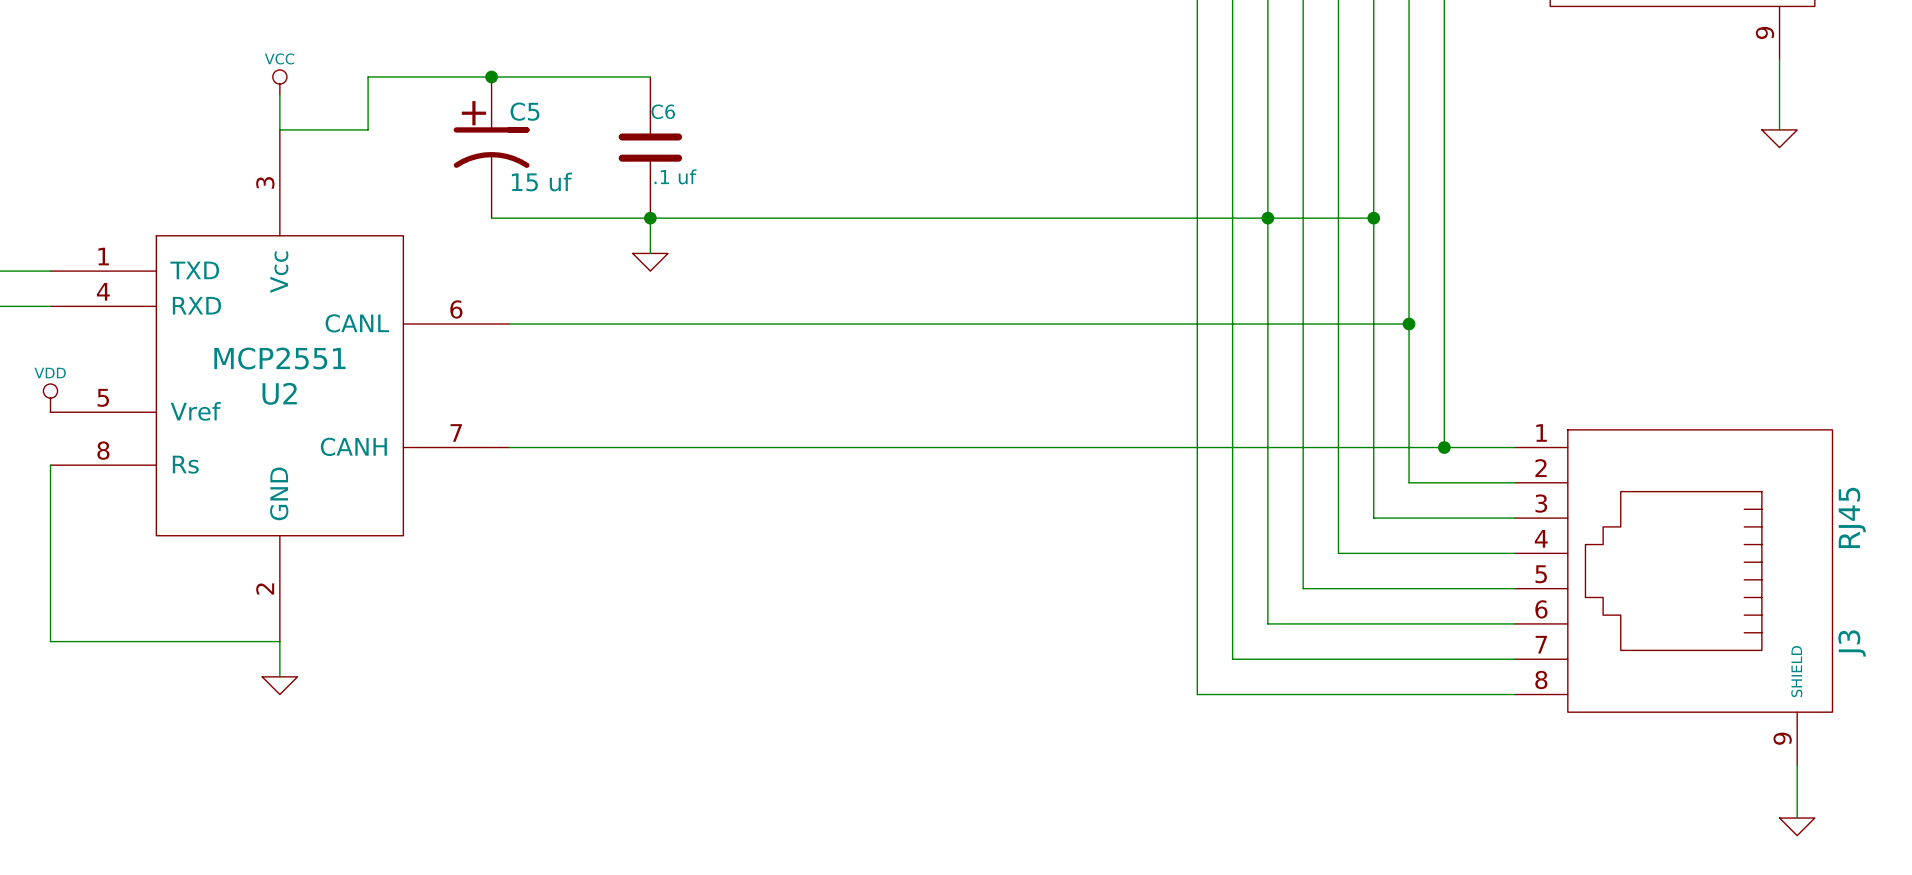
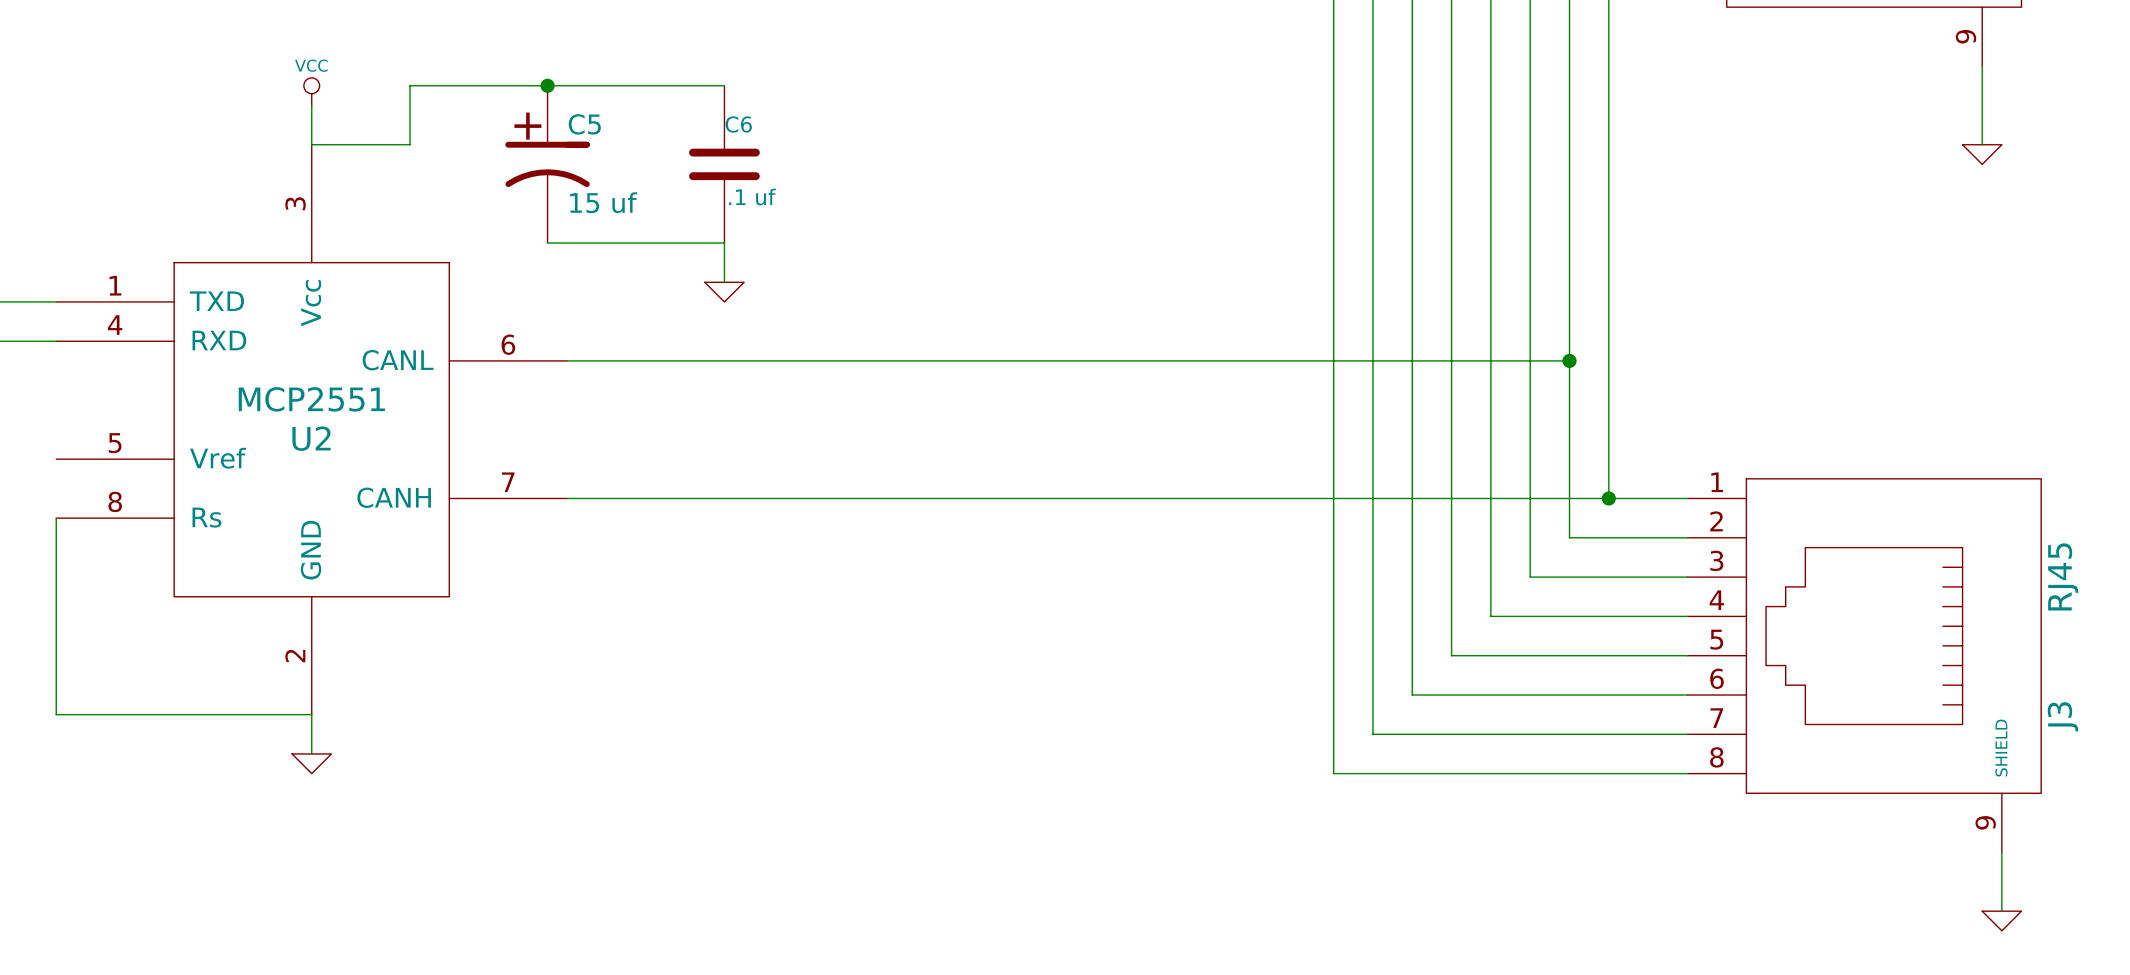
wire: (650, 218) (1373, 218) -> none
junction: (650, 218) -> none
junction: (1267, 218) -> none
junction: (1373, 218) -> none
power symbol: VDD (50, 398) -> none

